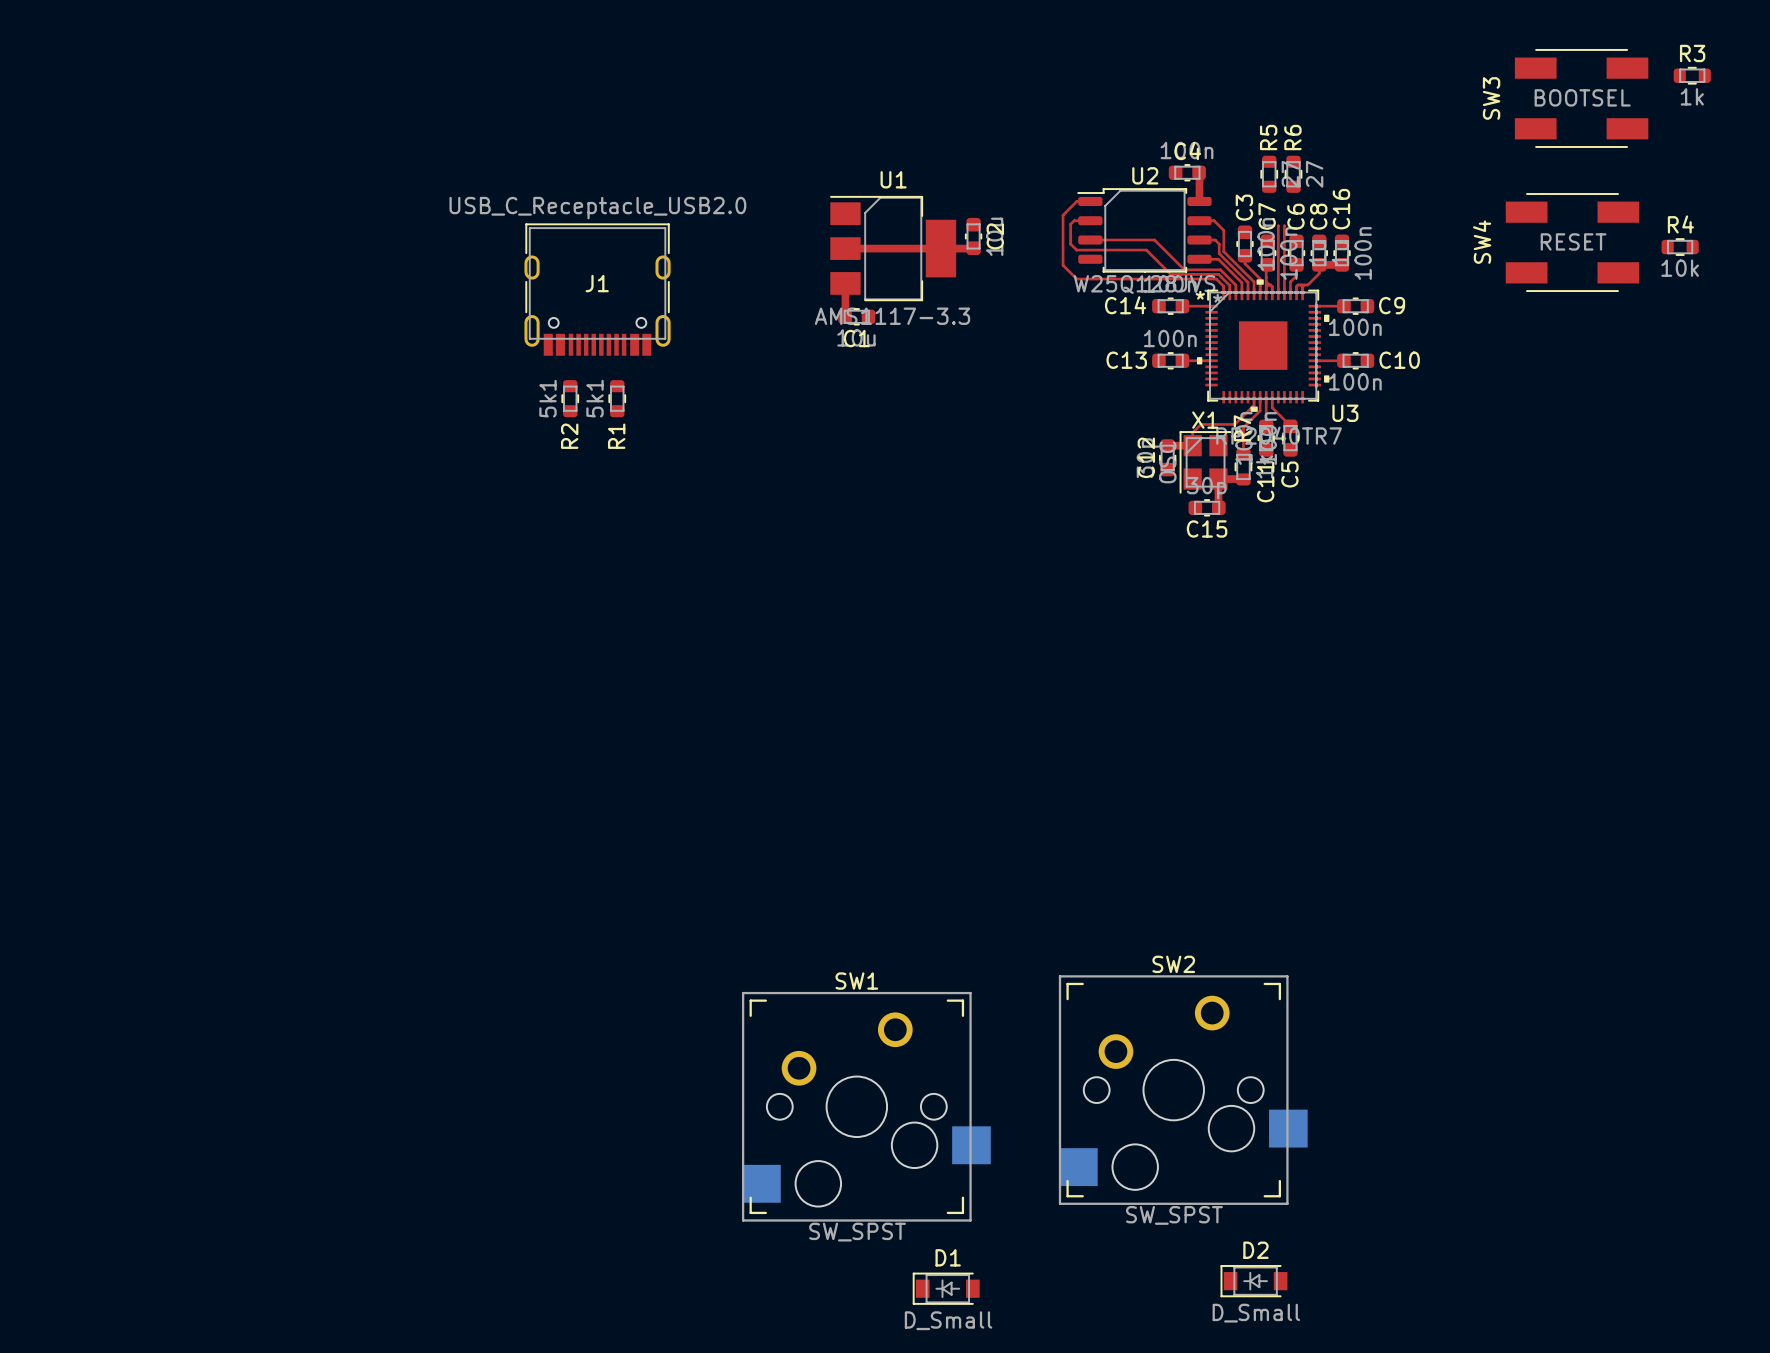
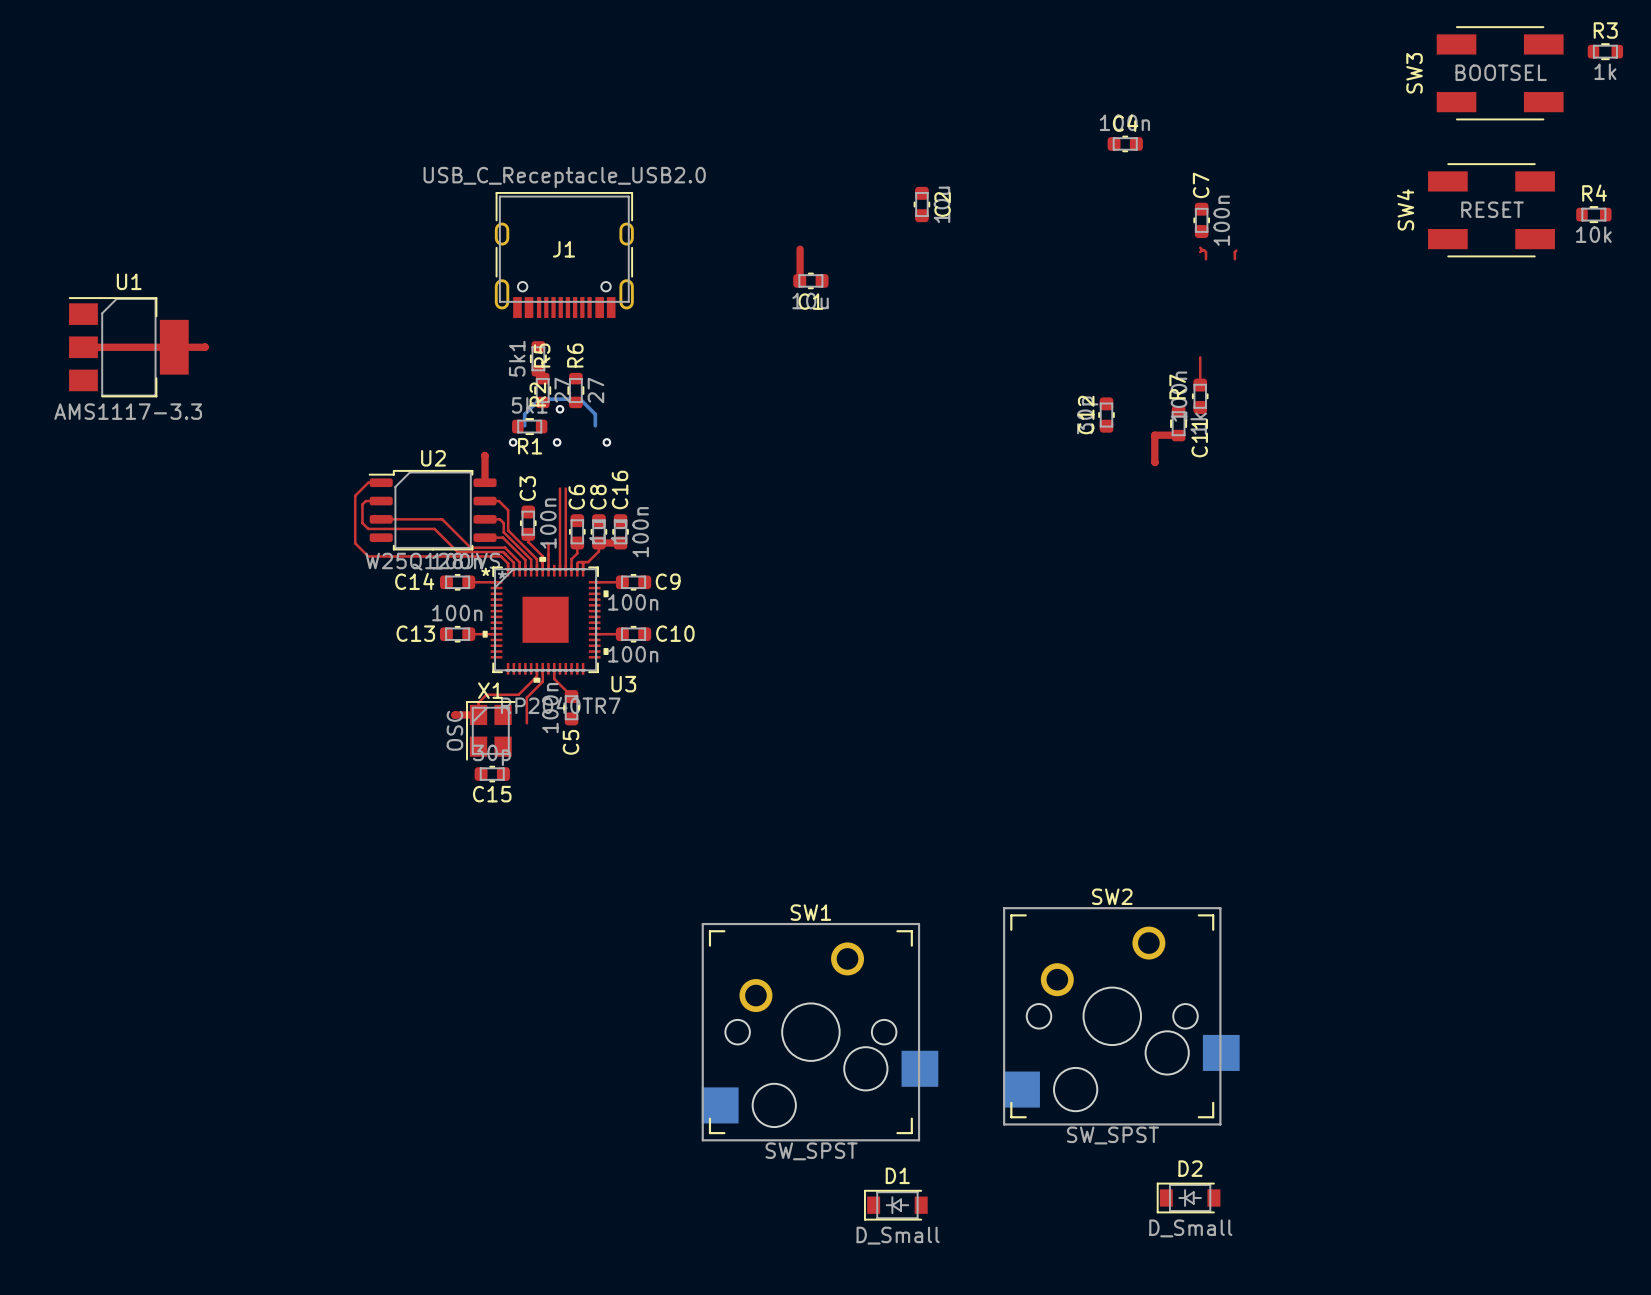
top track: (1199, 172) (1199, 201) -> none
R5 position: (1269, 174) -> (542, 390)
R6 position: (1293, 174) -> (575, 390)
top track: (1090, 201) (1076, 201) (1063, 215) (1063, 265) (1076, 279) (1216, 279) (1223, 286) (1223, 294) -> none
top track: (1090, 220) (1074, 220) (1070, 224) (1070, 244) (1076, 250) (1146, 250) (1170, 274) (1218, 274) (1229, 285) (1229, 294) -> none
top track: (1199, 220) (1214, 220) (1223, 230) (1223, 251) (1254, 281) (1254, 294) -> none
top track: (1278, 225) (1278, 294) -> none
top track: (1284, 225) (1284, 294) -> none
U2 position: (1144, 230) -> (432, 510)
top track: (1090, 240) (1154, 240) (1184, 269) (1220, 269) (1235, 285) (1235, 294) -> none
top track: (1199, 240) (1215, 240) (1219, 244) (1219, 253) (1248, 282) (1248, 294) -> none
C3 position: (1244, 244) -> (528, 523)
U1 position: (893, 248) -> (128, 347)
top track: (973, 248) (845, 248) -> none
C6 position: (1296, 253) -> (577, 531)
C8 position: (1319, 253) -> (598, 531)
C16 position: (1342, 253) -> (620, 531)
top track: (1244, 255) (1244, 263) (1260, 278) (1260, 294) -> none
top track: (1199, 259) (1218, 259) (1241, 282) (1241, 294) -> none
top track: (1264, 264) (1266, 294) -> none
top track: (1296, 264) (1296, 275) (1290, 281) (1290, 294) -> none
top track: (1342, 264) (1319, 264) (1319, 273) (1307, 284) (1298, 284) (1296, 294) -> none
C14 position: (1170, 306) -> (457, 582)
top track: (1182, 306) (1211, 306) -> none
top track: (1314, 306) (1343, 306) -> none
C9 position: (1355, 306) -> (633, 582)
U3 position: (1263, 345) -> (545, 619)
C13 position: (1170, 360) -> (457, 634)
top track: (1182, 360) (1211, 360) -> none
top track: (1314, 360) (1343, 360) -> none
C10 position: (1355, 360) -> (633, 634)
top track: none -> (205, 346) (83, 347)
top track: (1254, 397) (1254, 405) (1234, 424) (1201, 424) (1192, 432) (1192, 445) (1167, 446) -> none
top track: (1260, 397) (1260, 410) (1243, 427) (1243, 454) -> none
top track: (1272, 397) (1272, 407) (1290, 426) -> none
R1 rotation: 0° (617, 398) -> 90° clockwise (529, 426)
R1 position: (617, 398) -> (529, 426)
C5 position: (1290, 438) -> (571, 707)
via: none -> (560, 409)
X1 position: (1205, 462) -> (490, 730)
bottom track: none -> (524, 425) (524, 414) (539, 399) (580, 399) (595, 414) (595, 425)
via: none -> (513, 442)
via: none -> (557, 442)
via: none -> (606, 442)
top track: none -> (484, 455) (485, 482)
C15 position: (1207, 507) -> (492, 774)
top track: none -> (381, 482) (368, 482) (355, 495) (355, 543) (368, 556) (501, 556) (508, 563) (508, 570)
top track: none -> (560, 488) (560, 570)
top track: none -> (565, 488) (565, 570)
top track: none -> (381, 501) (365, 501) (362, 504) (362, 523) (368, 528) (434, 528) (457, 552) (503, 552) (513, 562) (513, 570)
top track: none -> (485, 501) (498, 501) (508, 510) (508, 530) (536, 559) (536, 570)
top track: none -> (381, 519) (442, 519) (470, 547) (505, 547) (519, 562) (519, 570)
top track: none -> (485, 519) (499, 519) (503, 523) (503, 532) (531, 559) (531, 570)
top track: none -> (528, 534) (528, 541) (542, 556) (542, 570)
top track: none -> (485, 537) (502, 537) (525, 560) (525, 570)
top track: none -> (547, 543) (548, 570)
top track: none -> (577, 543) (577, 553) (571, 559) (571, 570)
top track: none -> (620, 543) (598, 543) (598, 551) (588, 562) (578, 562) (577, 570)
top track: none -> (468, 582) (496, 582)
top track: none -> (594, 582) (622, 582)
top track: none -> (468, 634) (496, 634)
top track: none -> (594, 634) (622, 634)
top track: none -> (536, 668) (536, 676) (518, 694) (486, 694) (478, 702) (478, 714) (454, 715)
top track: none -> (542, 668) (542, 681) (526, 697) (526, 723)
top track: none -> (554, 668) (554, 678) (571, 696)

